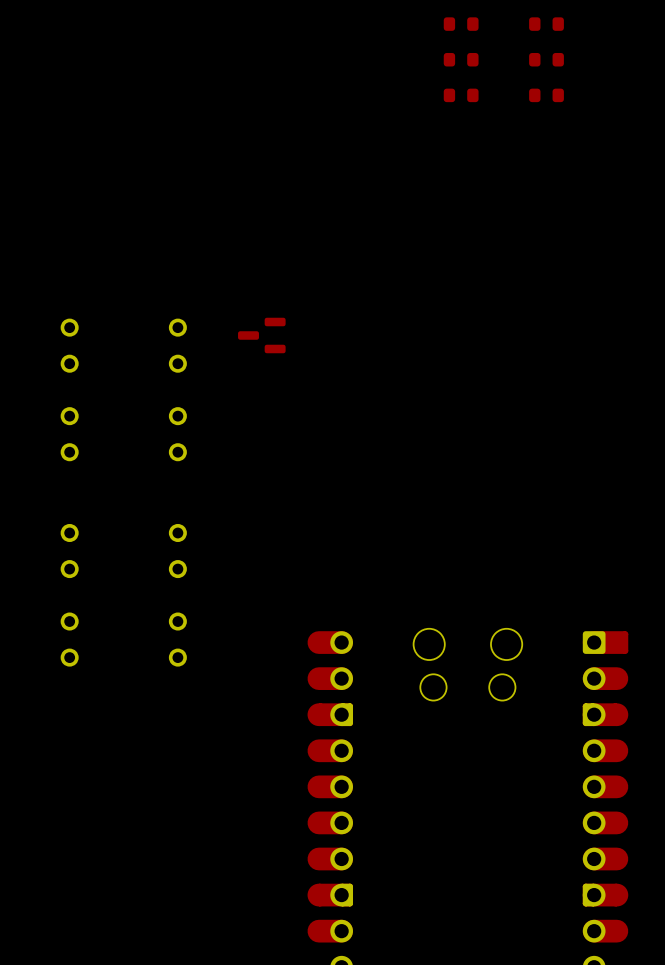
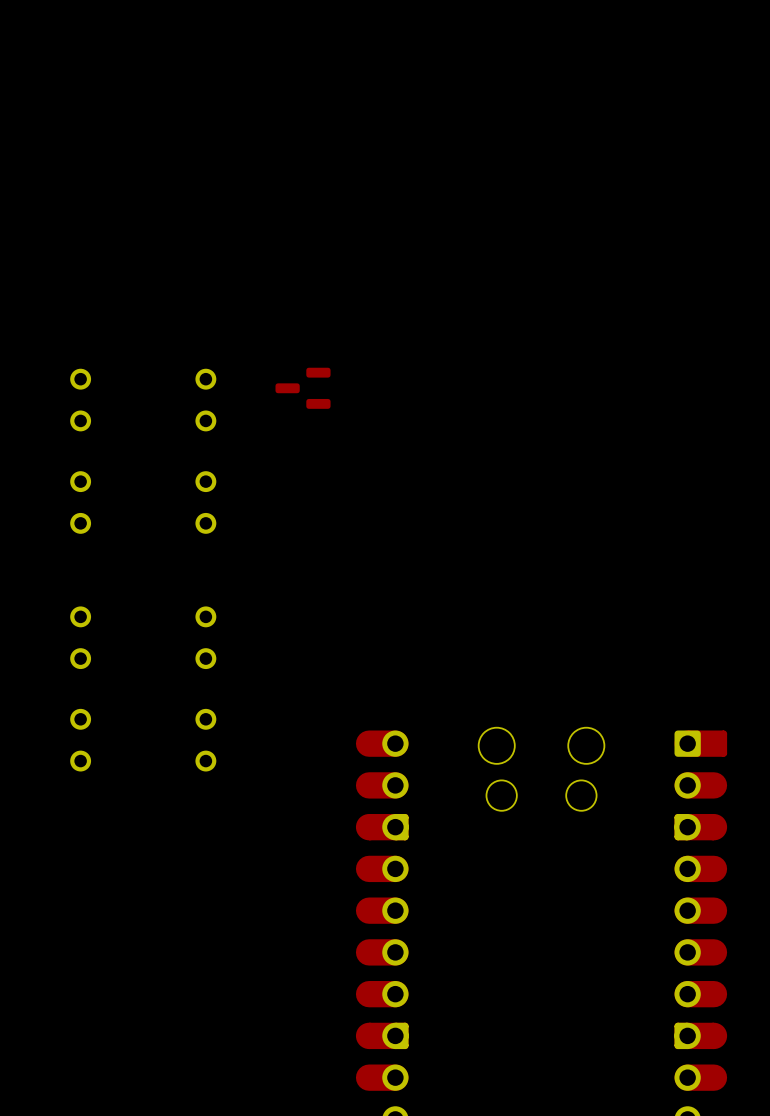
part: (461, 24) -> none
part: (546, 24) -> none
part: (461, 59) -> none
part: (546, 59) -> none
part: (461, 95) -> none
part: (546, 95) -> none

